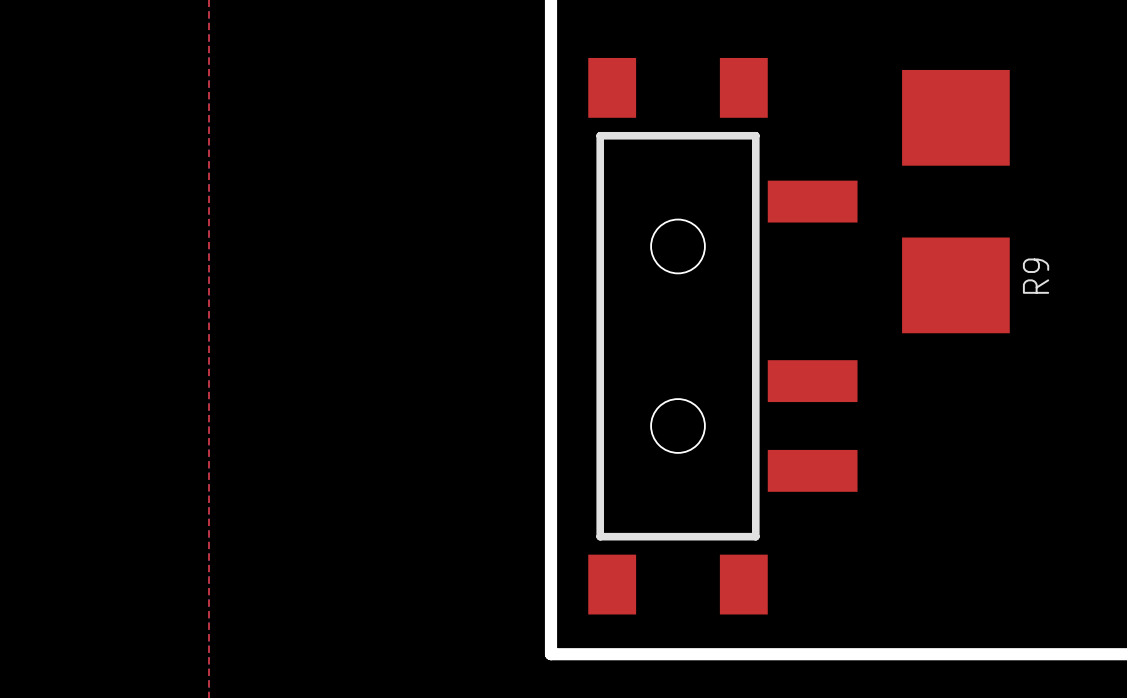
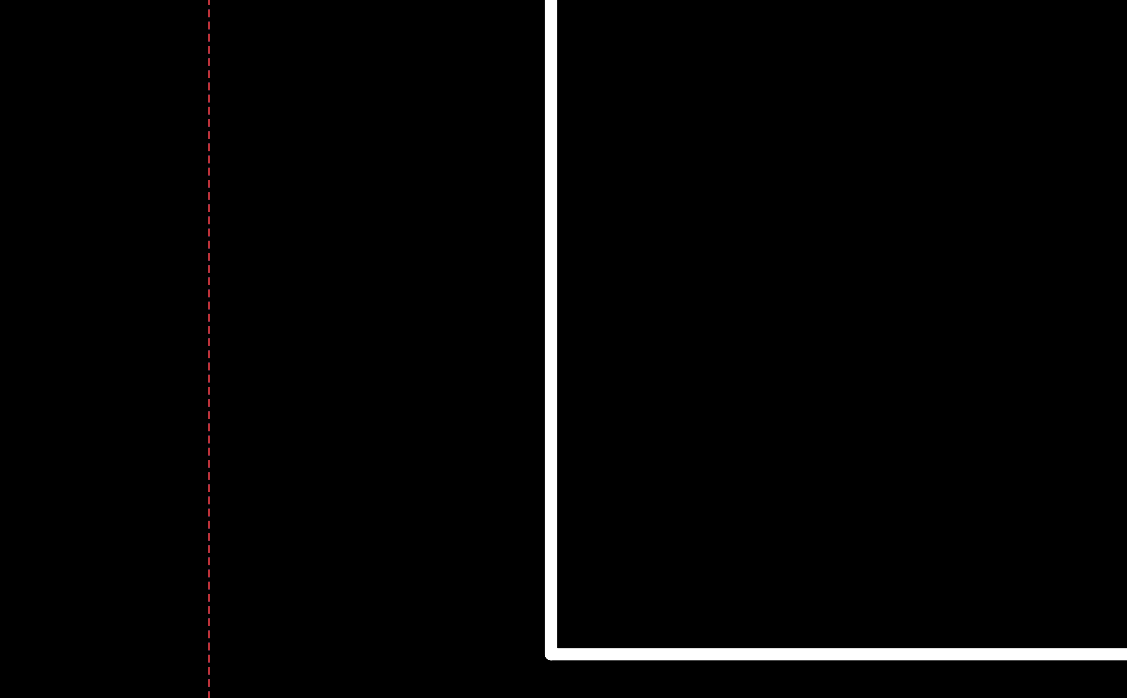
R9: (955, 201) -> none
part: (722, 336) -> none

